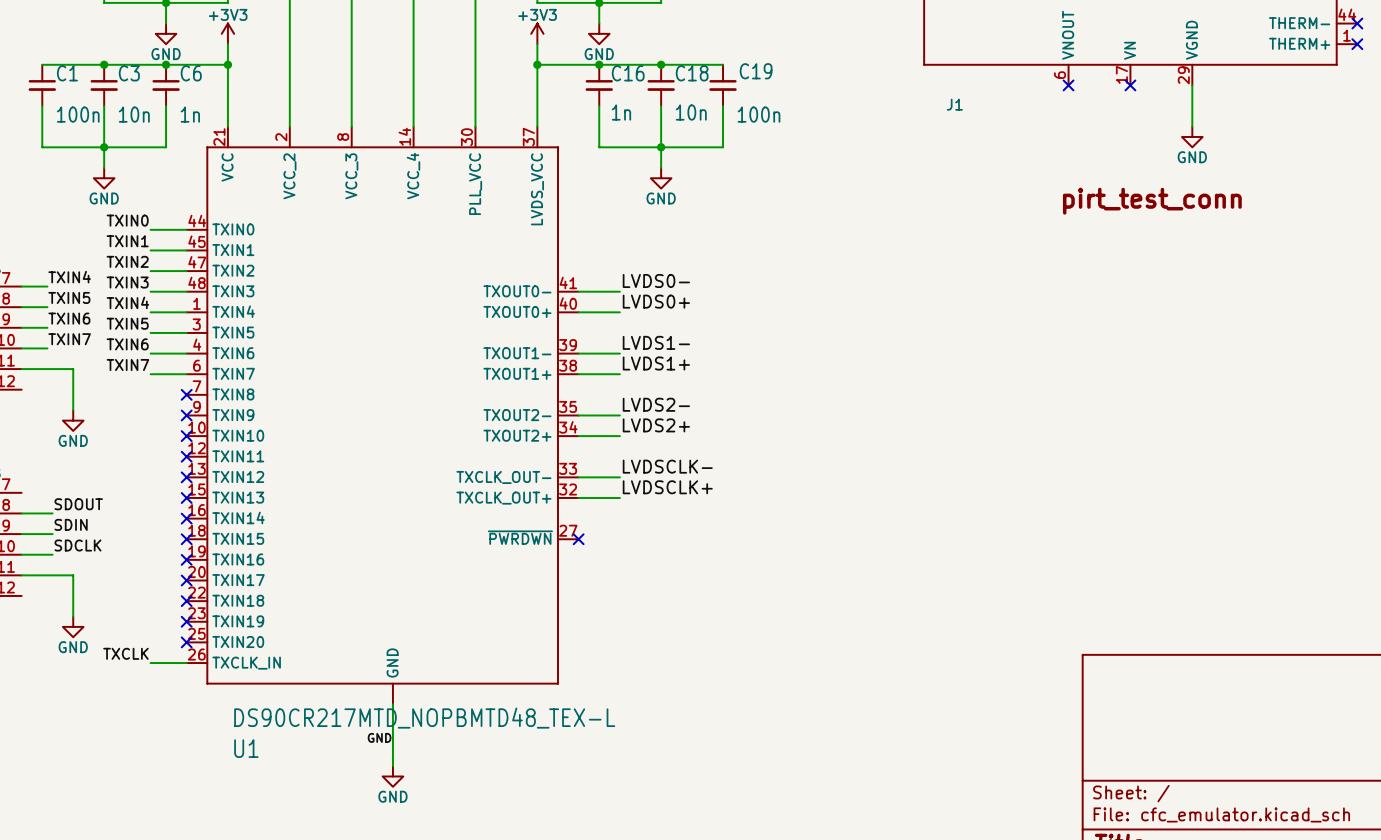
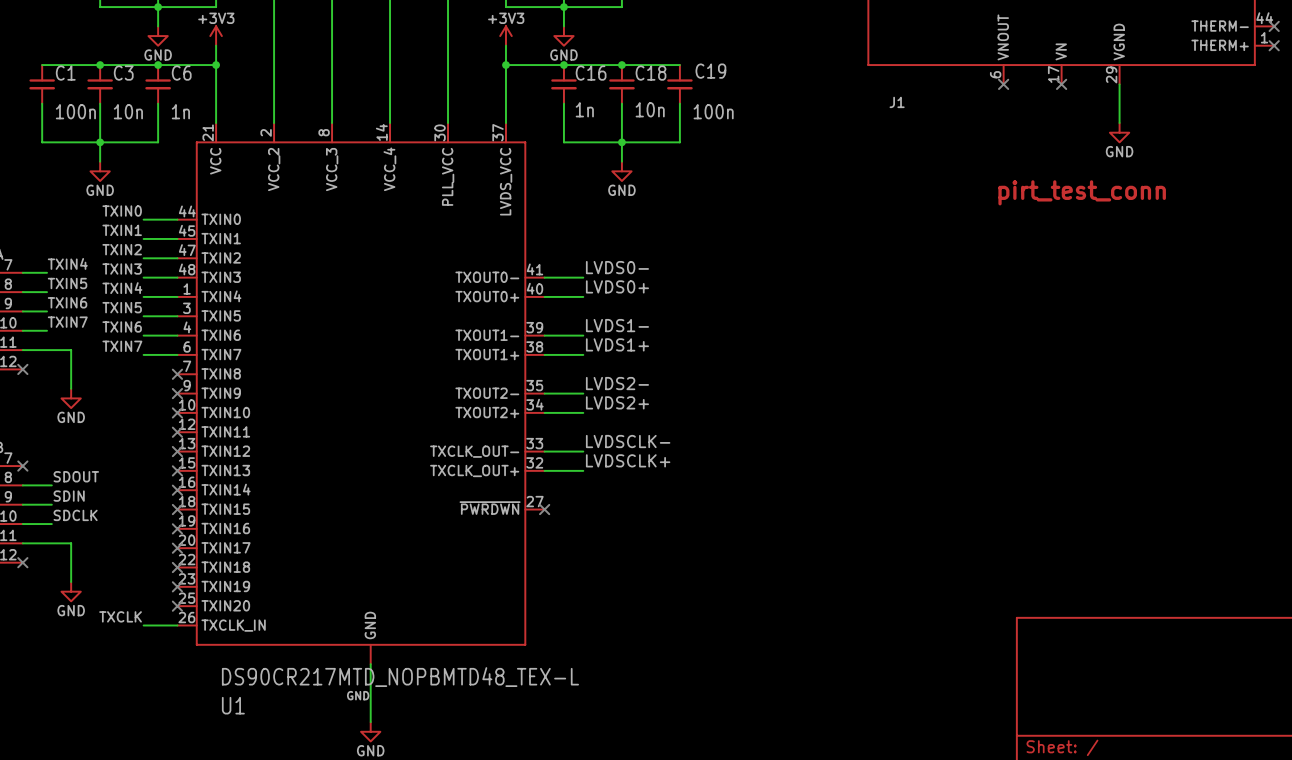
no-connect mark: none -> (22, 369)
no-connect mark: none -> (22, 466)
no-connect mark: none -> (22, 562)

